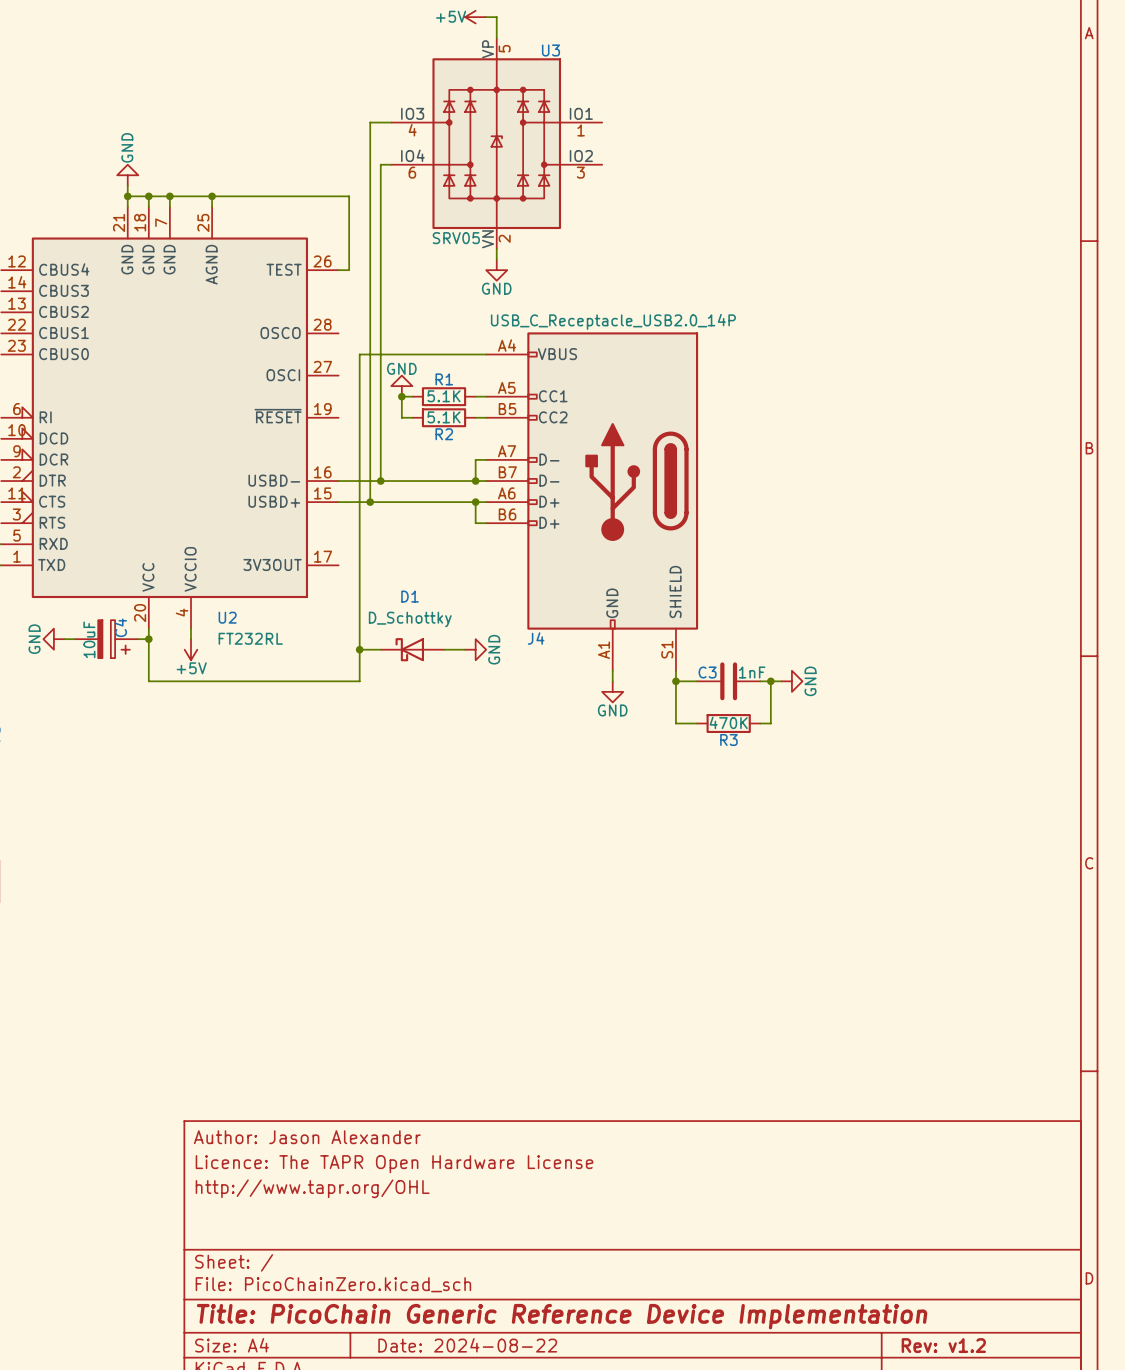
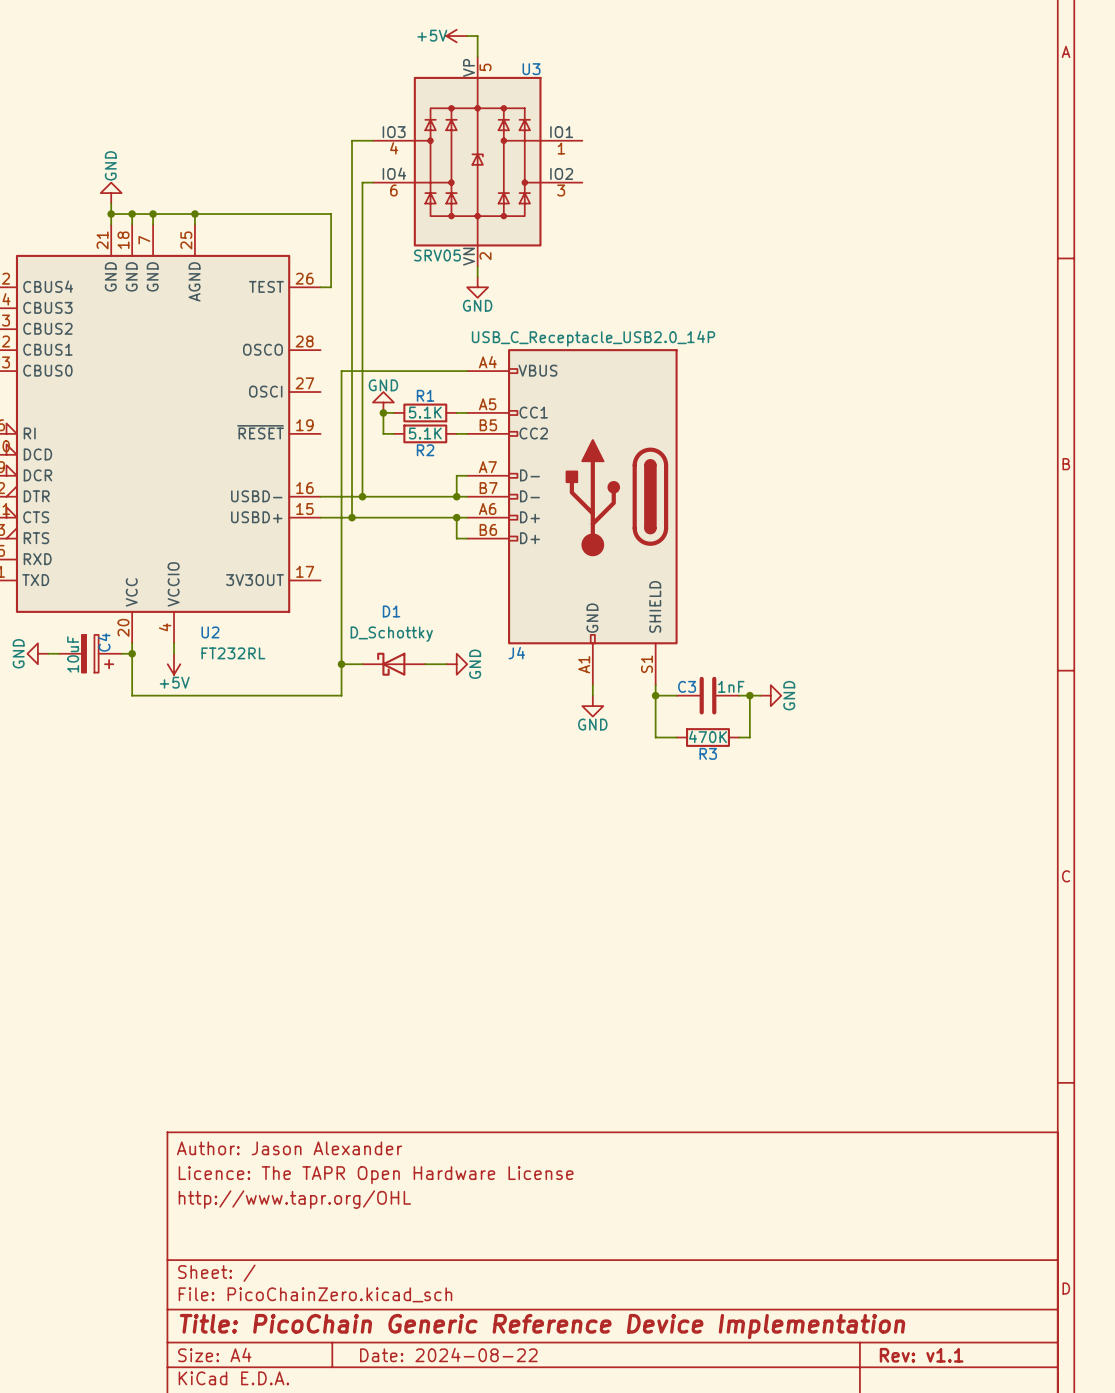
title block: Rev: v1.2 (943, 1345) -> Rev: v1.1 (921, 1355)

